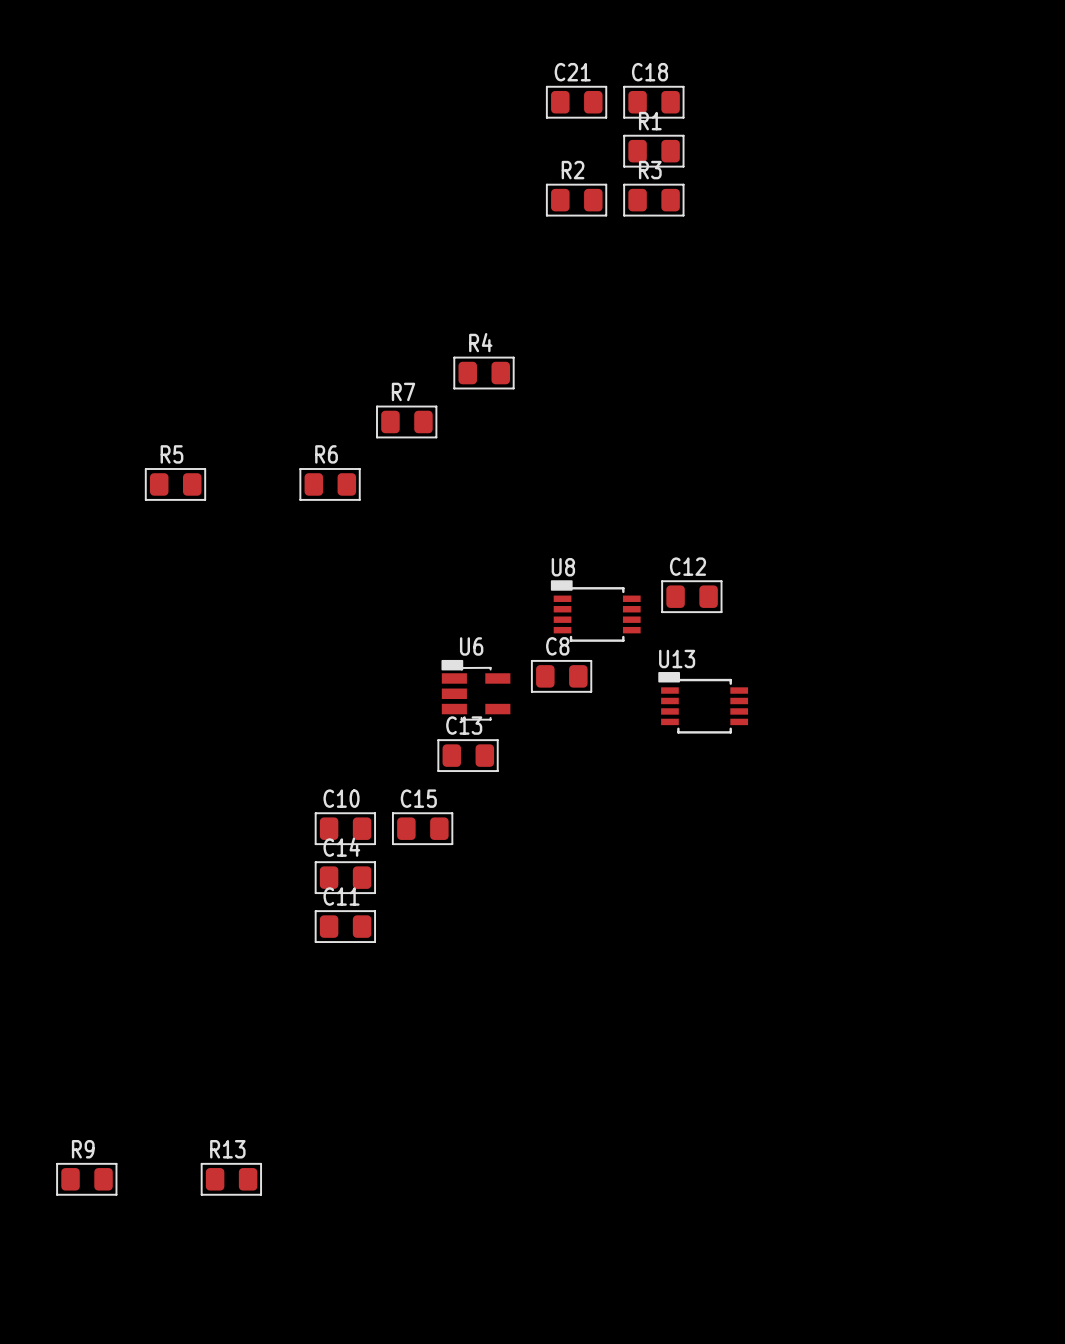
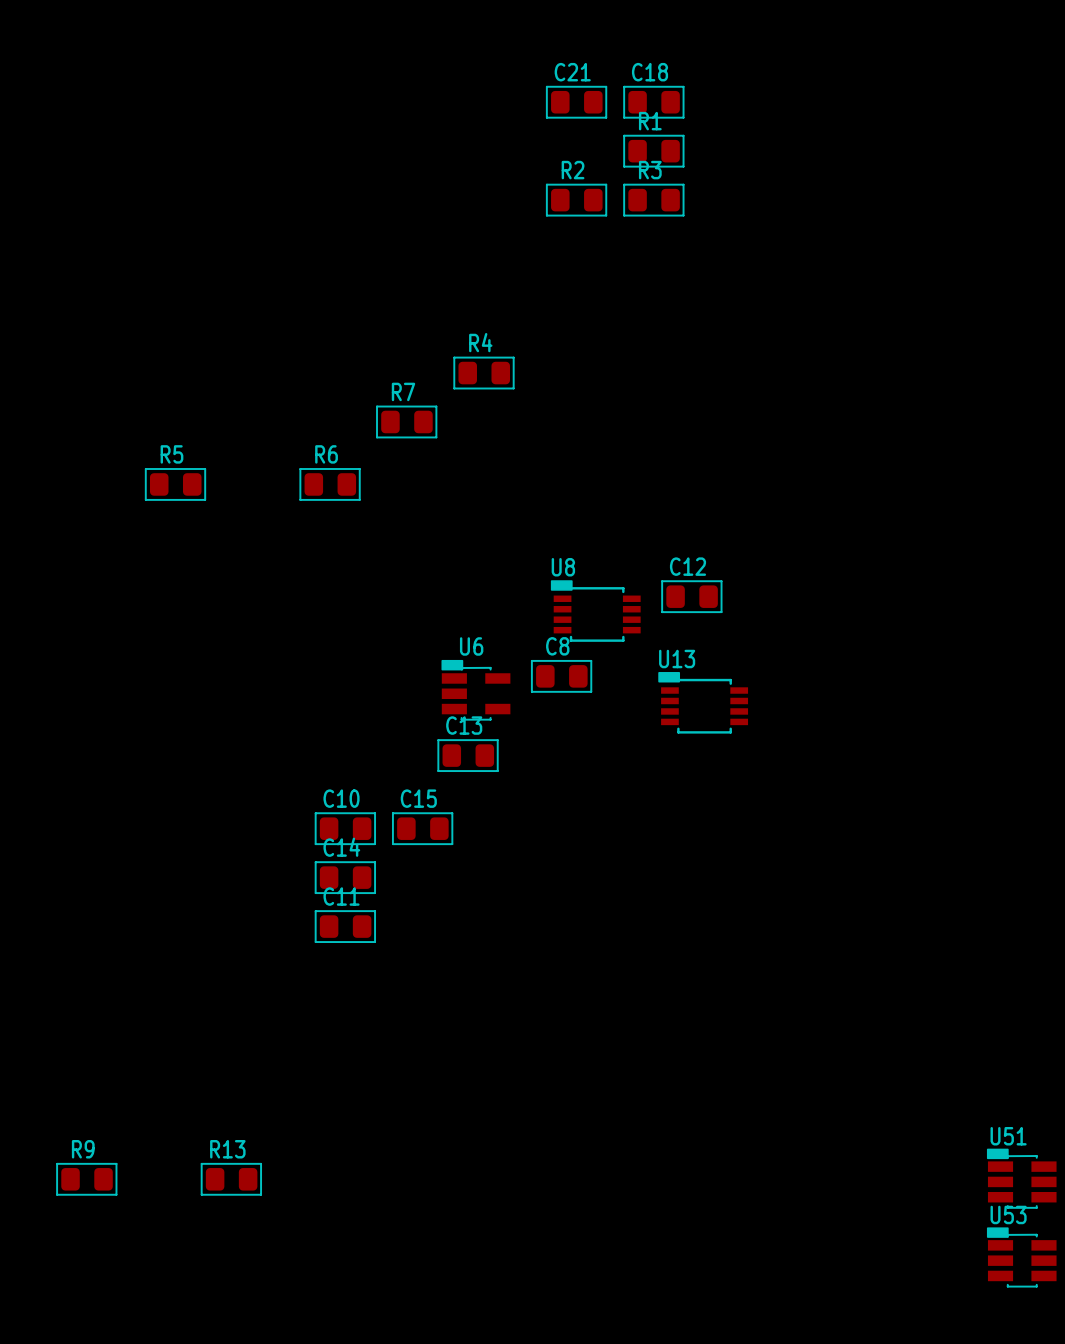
U51: none -> (1021, 1178)
U53: none -> (1021, 1257)

